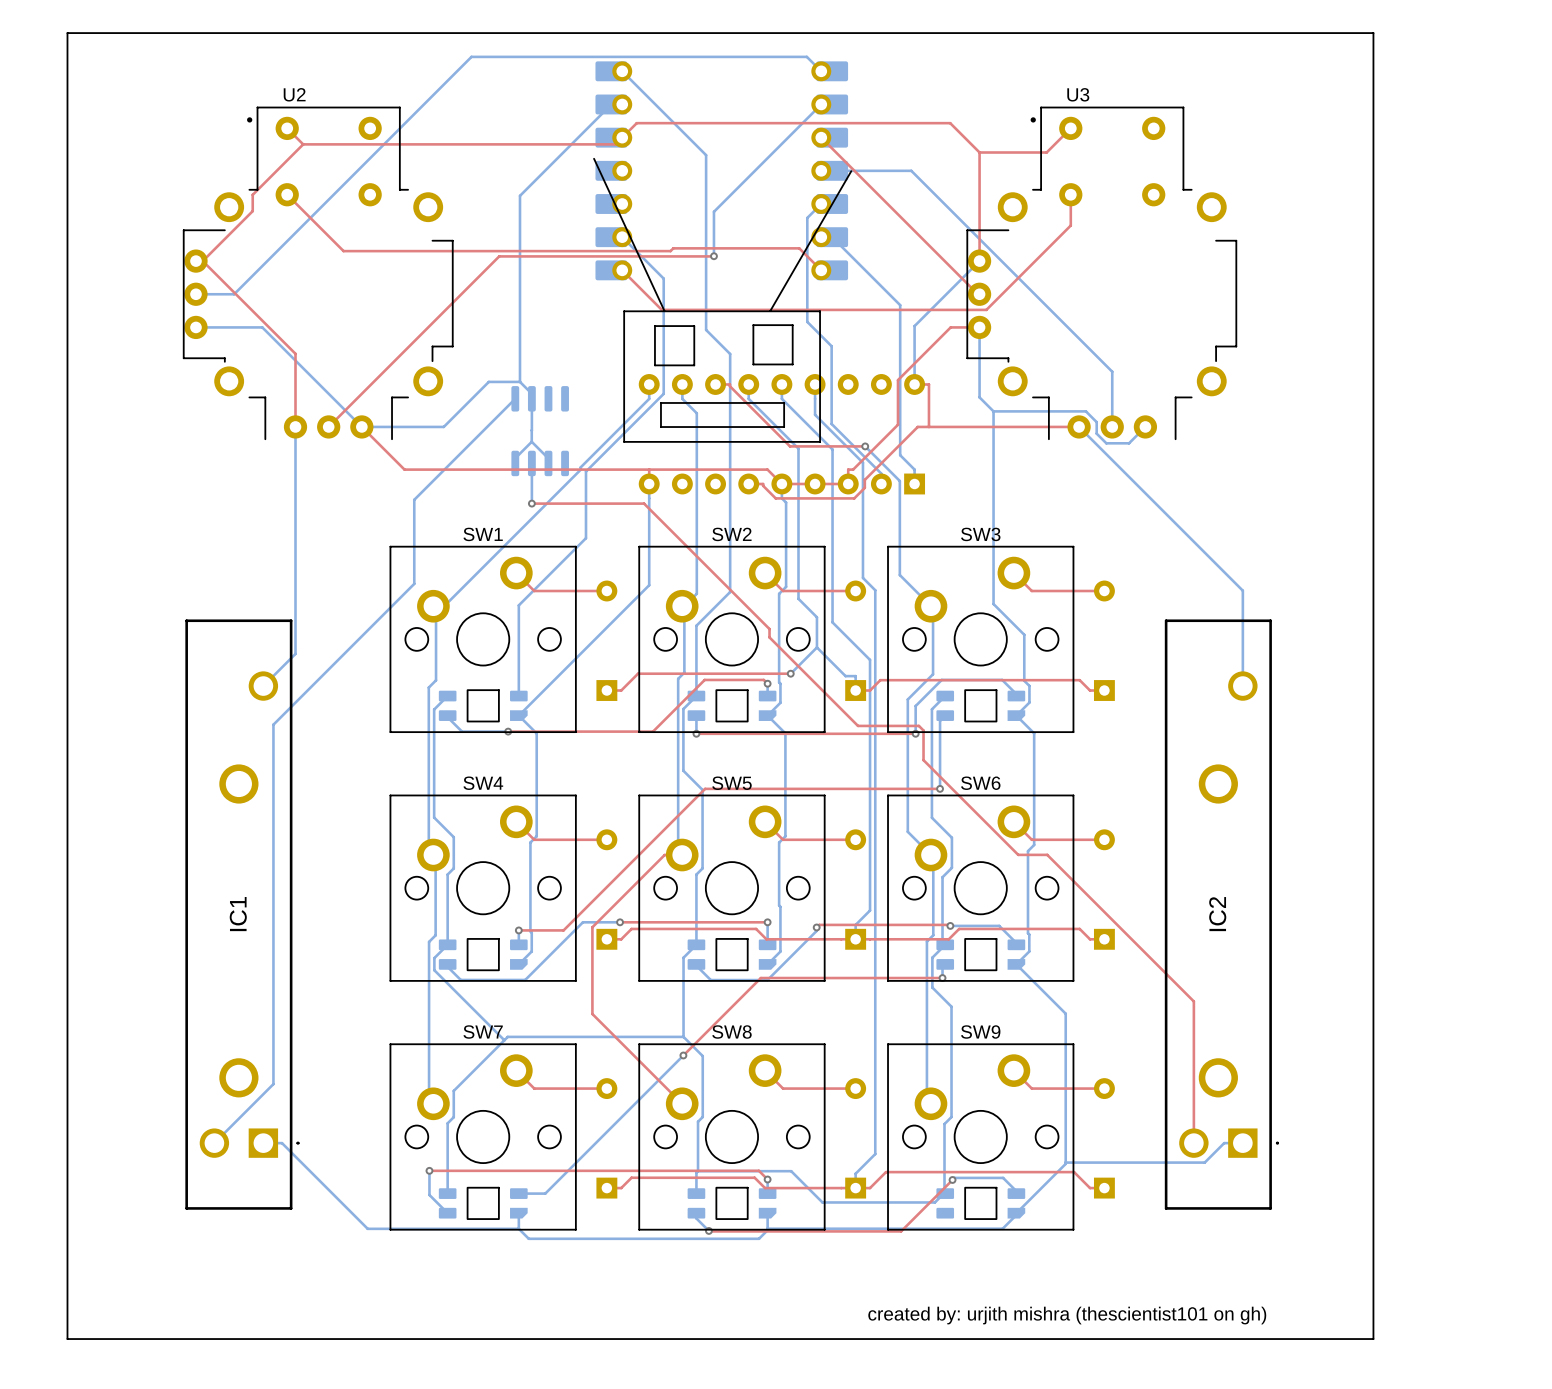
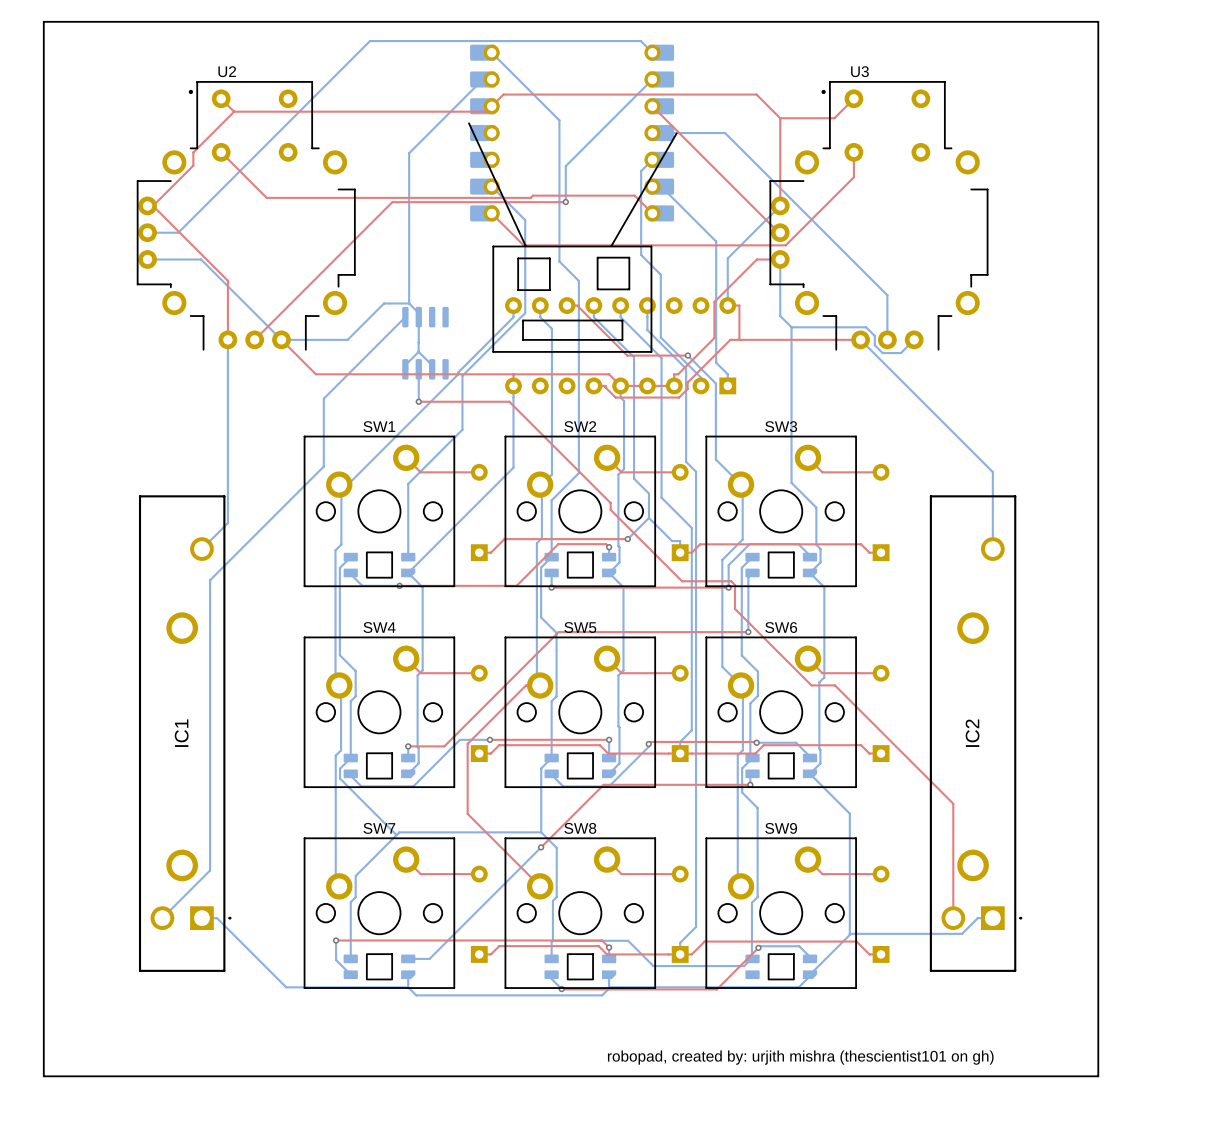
text: created by: urjith mishra (thescientist101 on gh) (1067, 1315) -> robopad, created by: urjith mishra (thescientist101 on gh) (800, 1057)

